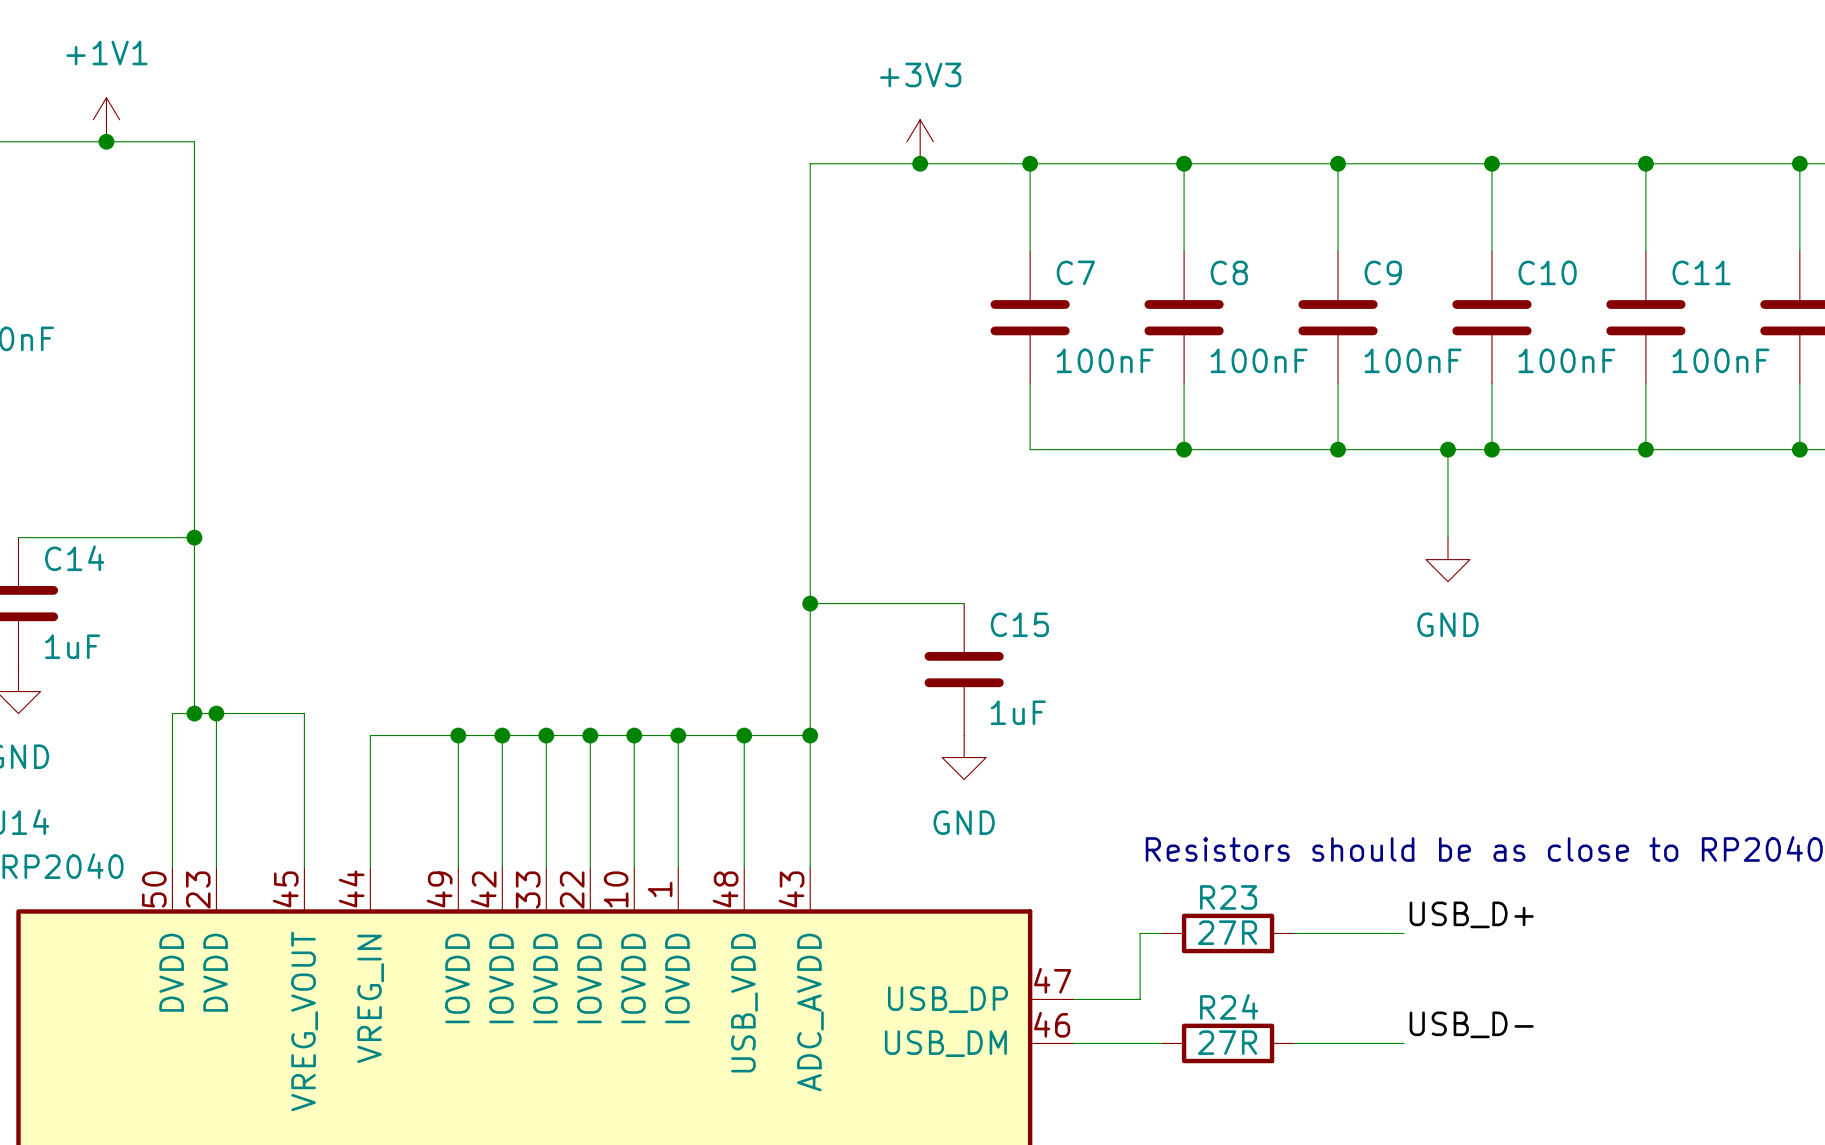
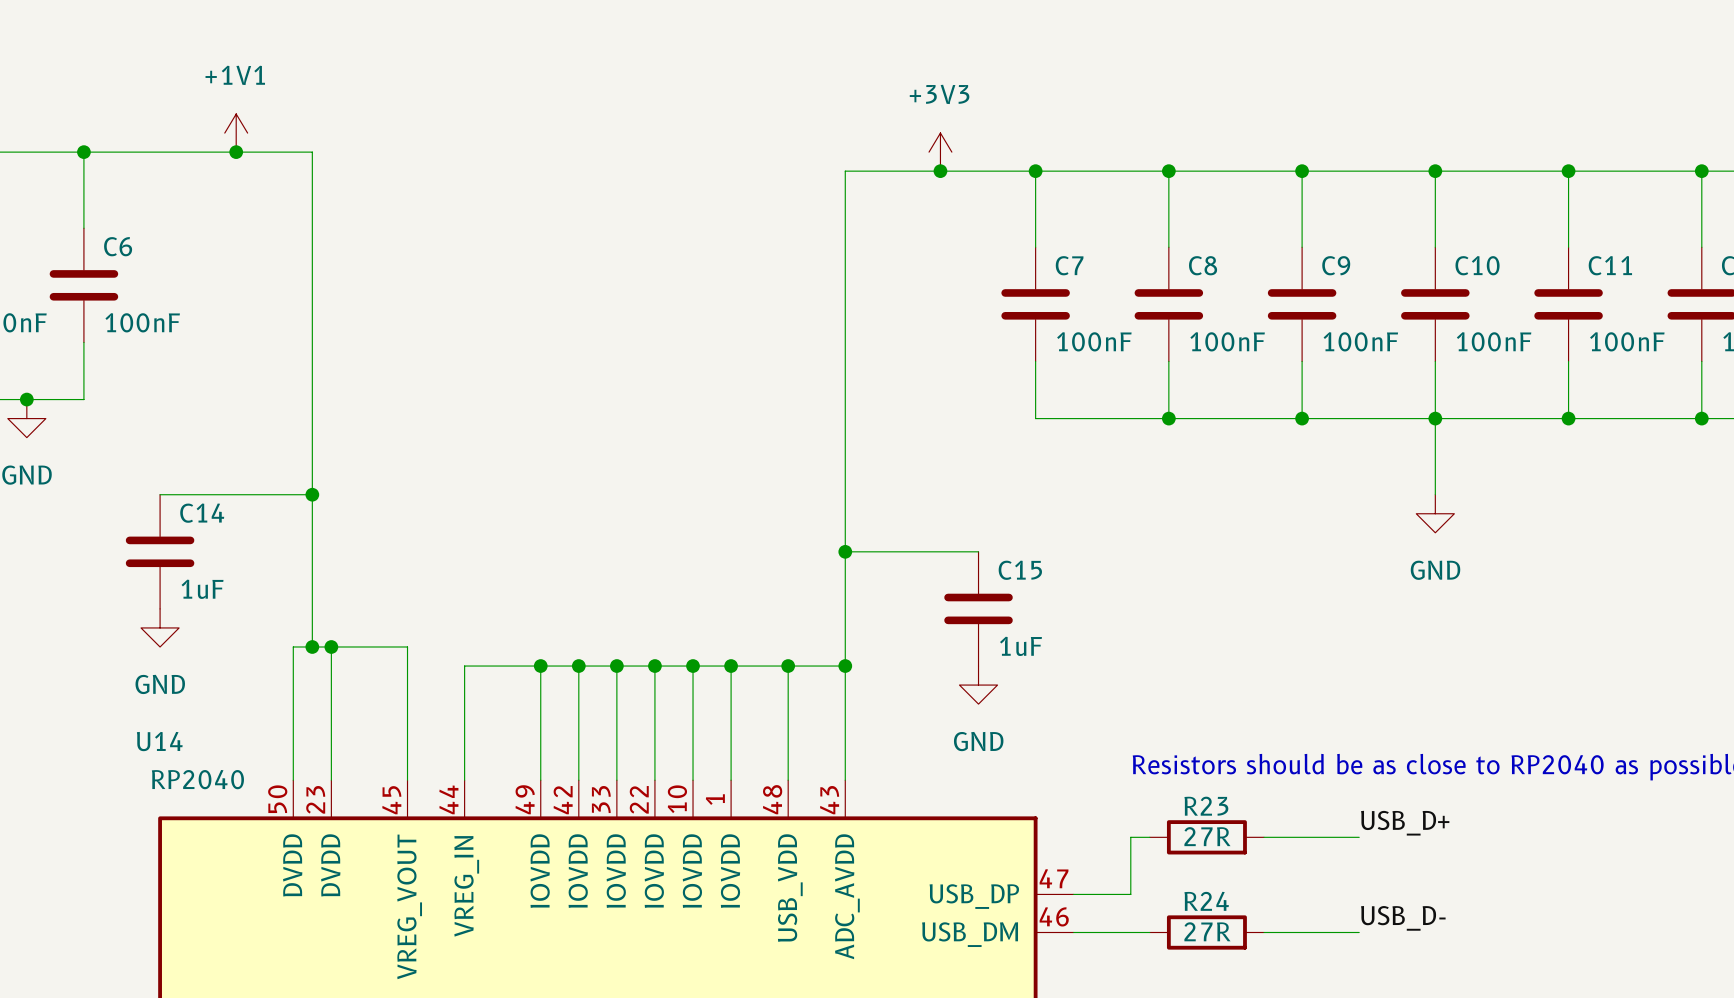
wire: (1447, 449) (1447, 537) -> (1435, 418) (1435, 494)
junction: (1447, 449) -> none
power symbol position: GND (1447, 559) -> GND (1435, 513)

